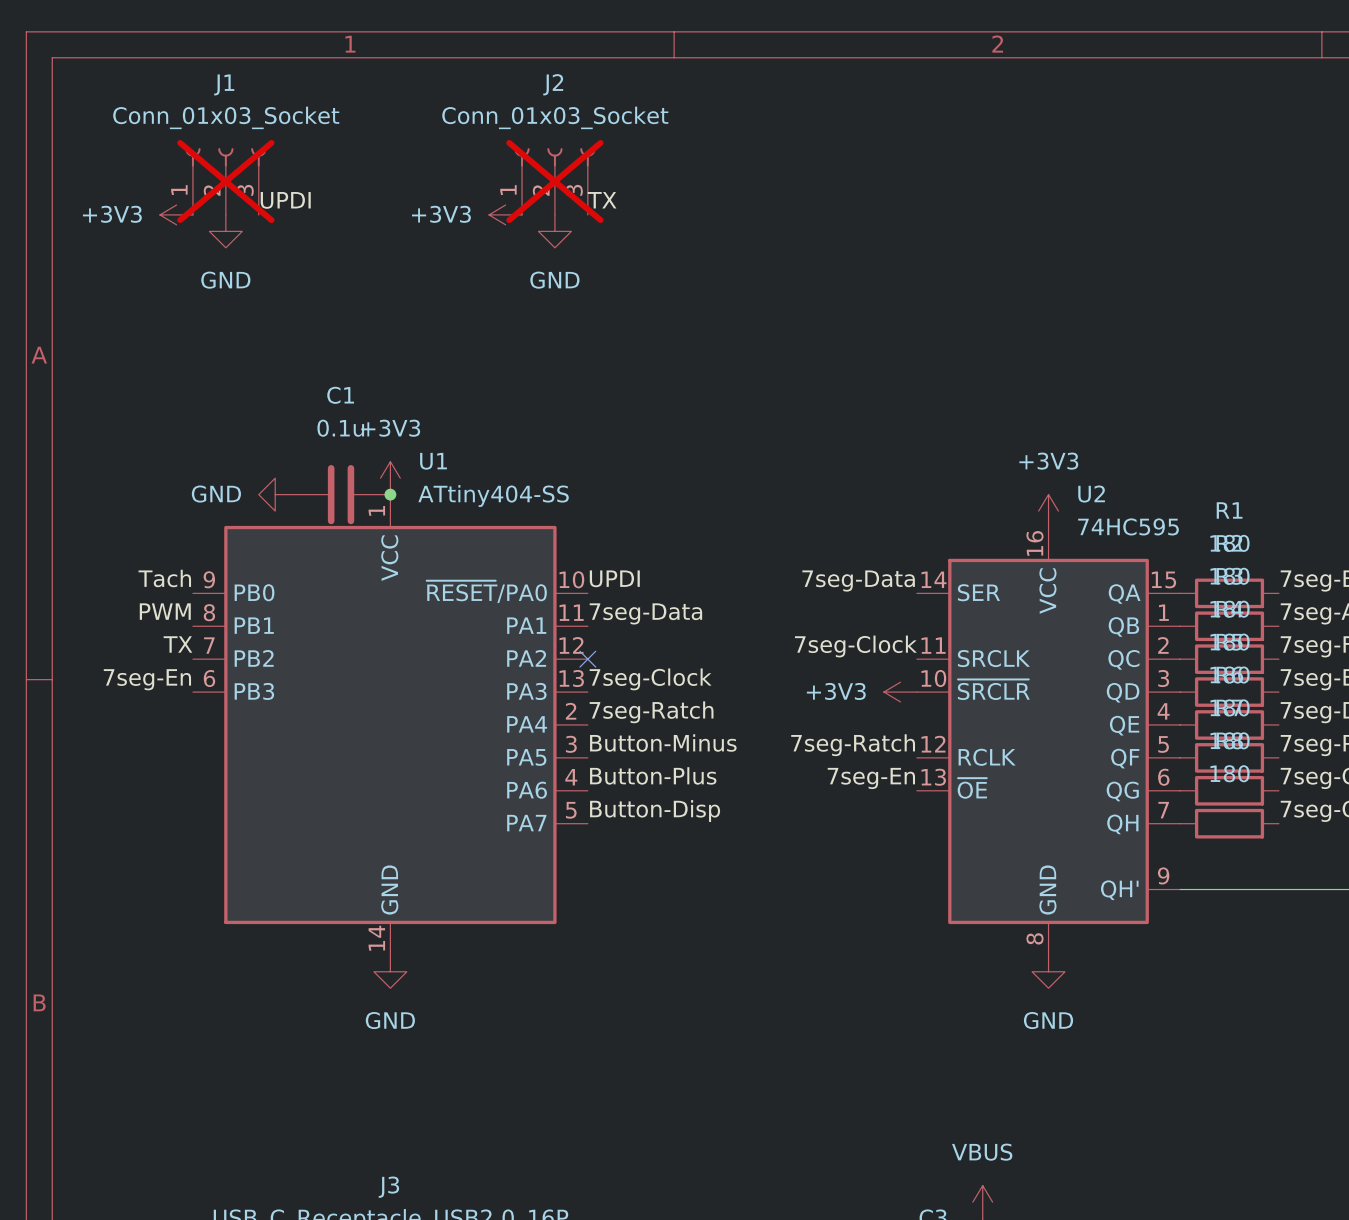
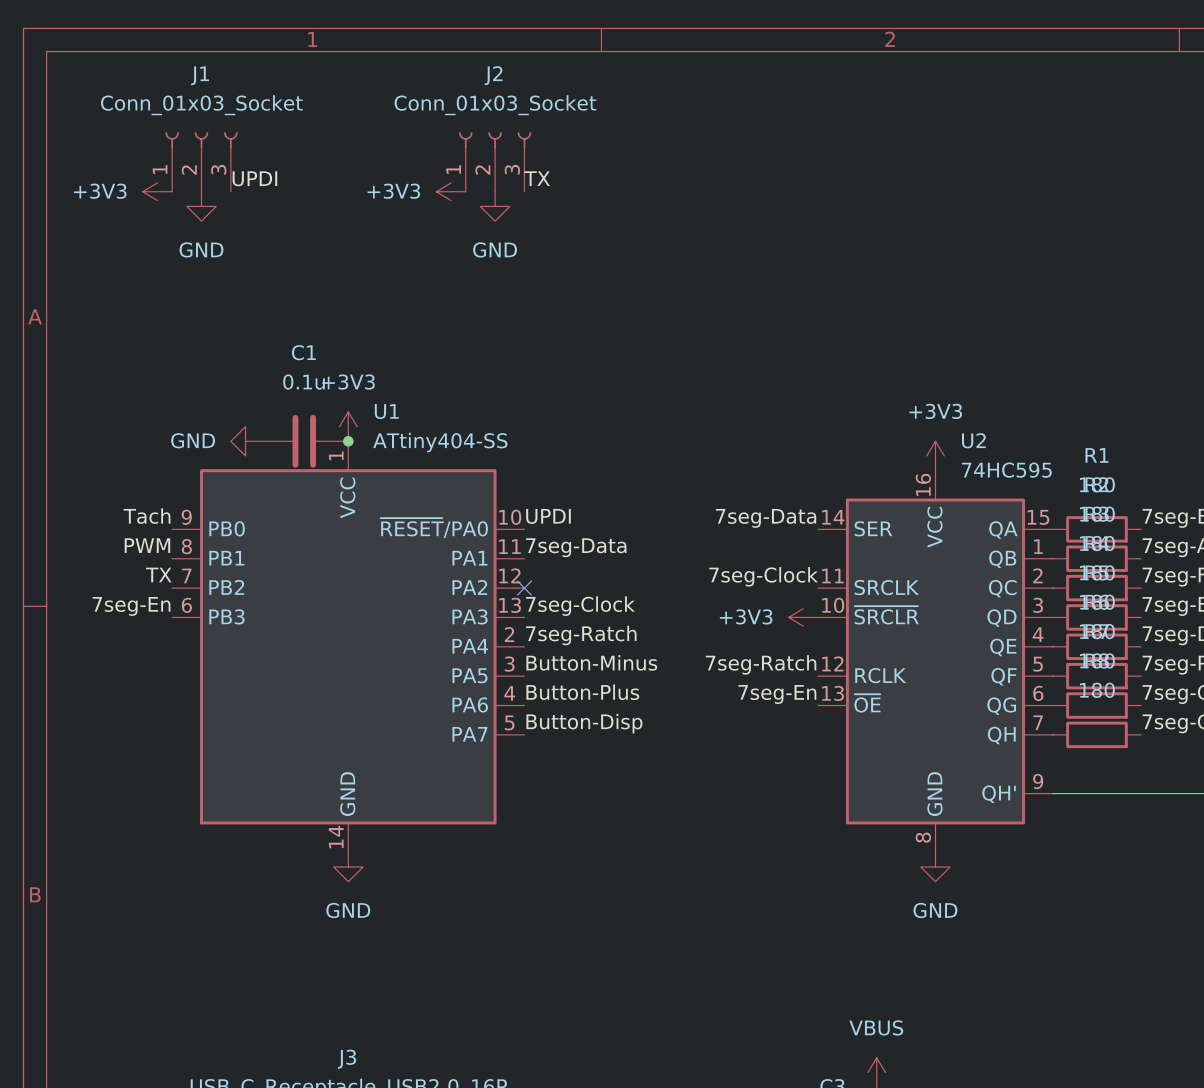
J1 do-not-place cross: (225, 181) -> none
J2 do-not-place cross: (554, 181) -> none

